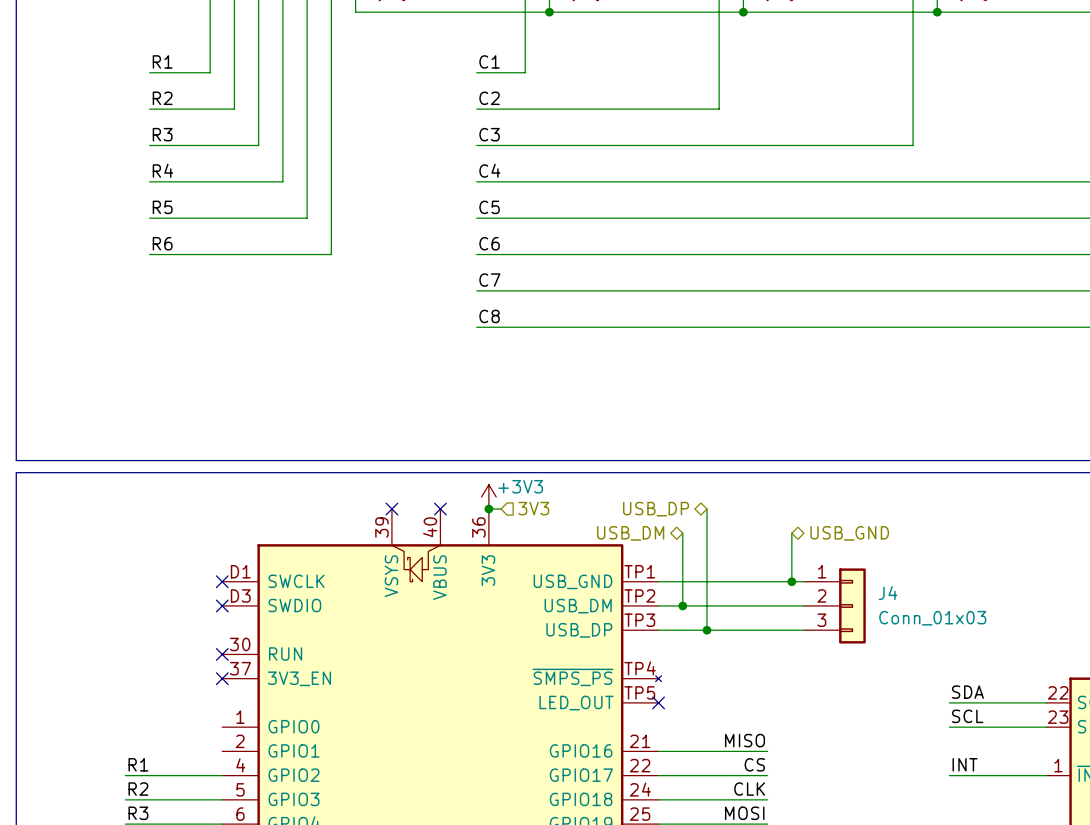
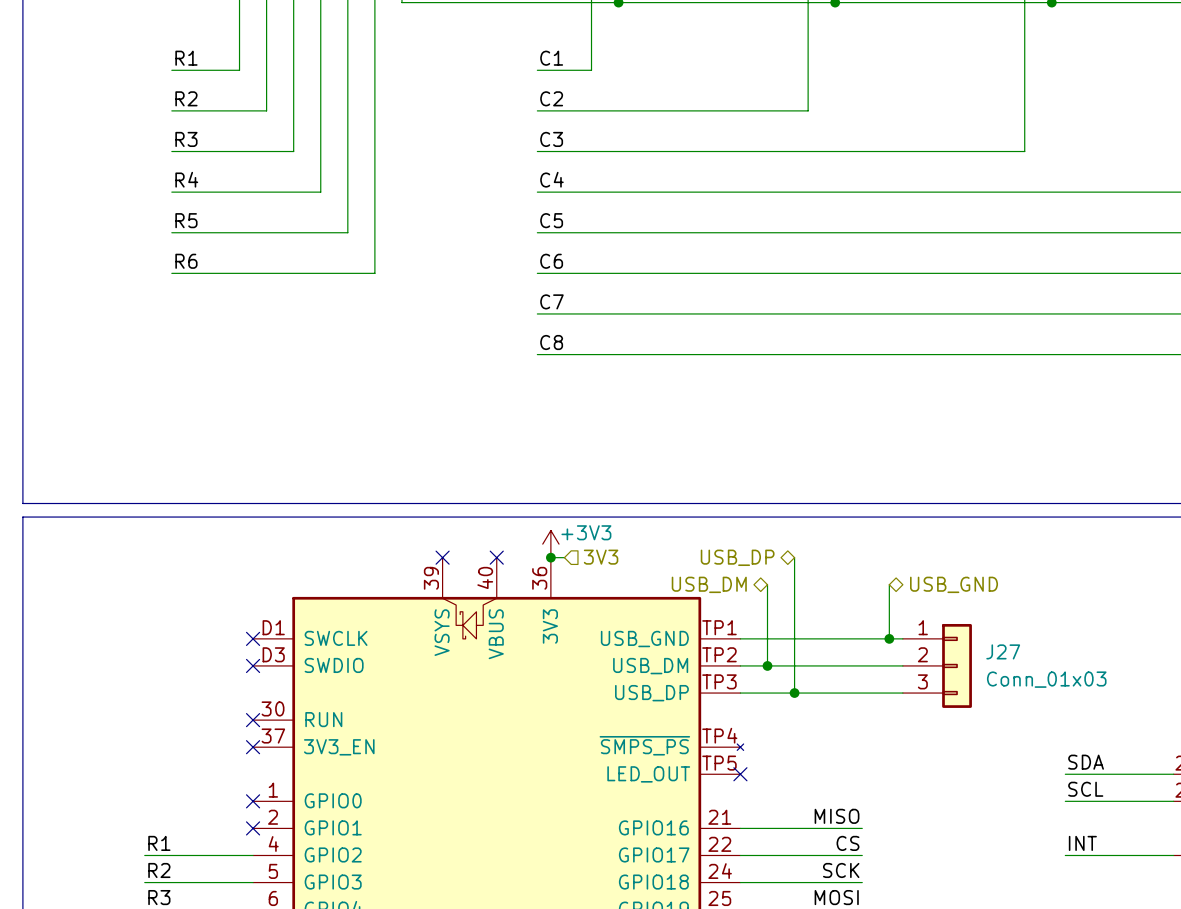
J4 name: J4 (888, 593) -> J27 (1003, 651)
no-connect mark: none -> (253, 801)
no-connect mark: none -> (253, 828)
label: CLK (749, 789) -> SCK (841, 870)

